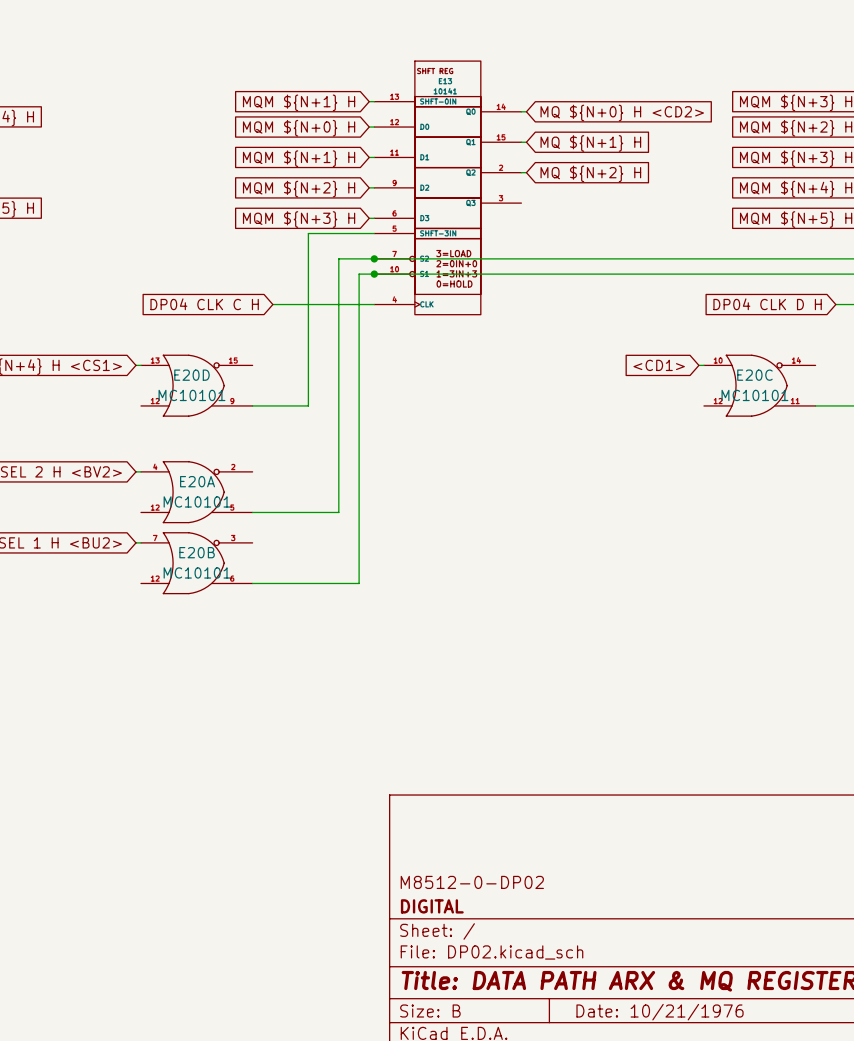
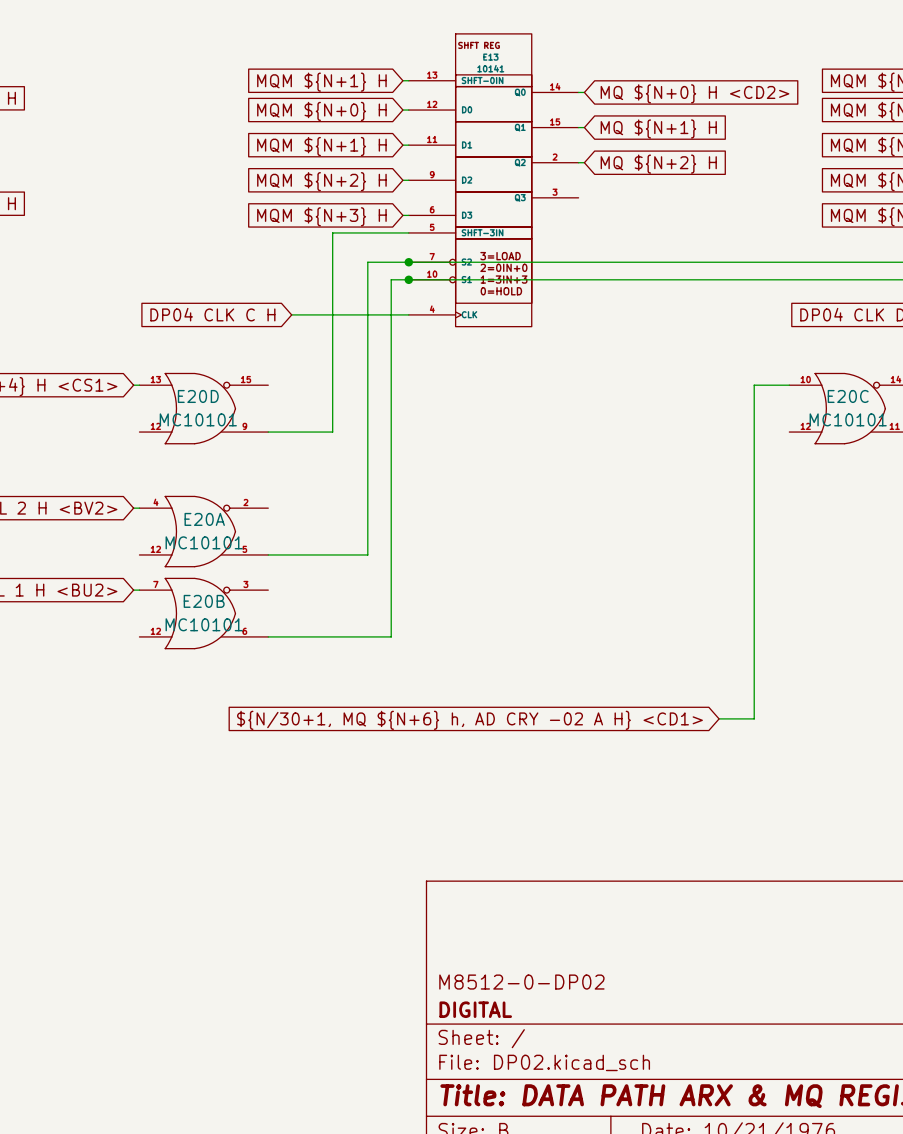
global label: <CD1> (659, 365) -> none
wire: none -> (783, 385) (754, 385) (754, 718) (719, 718)
global label: none -> ${N/30+1, MQ ${N+6} h, AD CRY -02 A H} <CD1> (469, 720)

